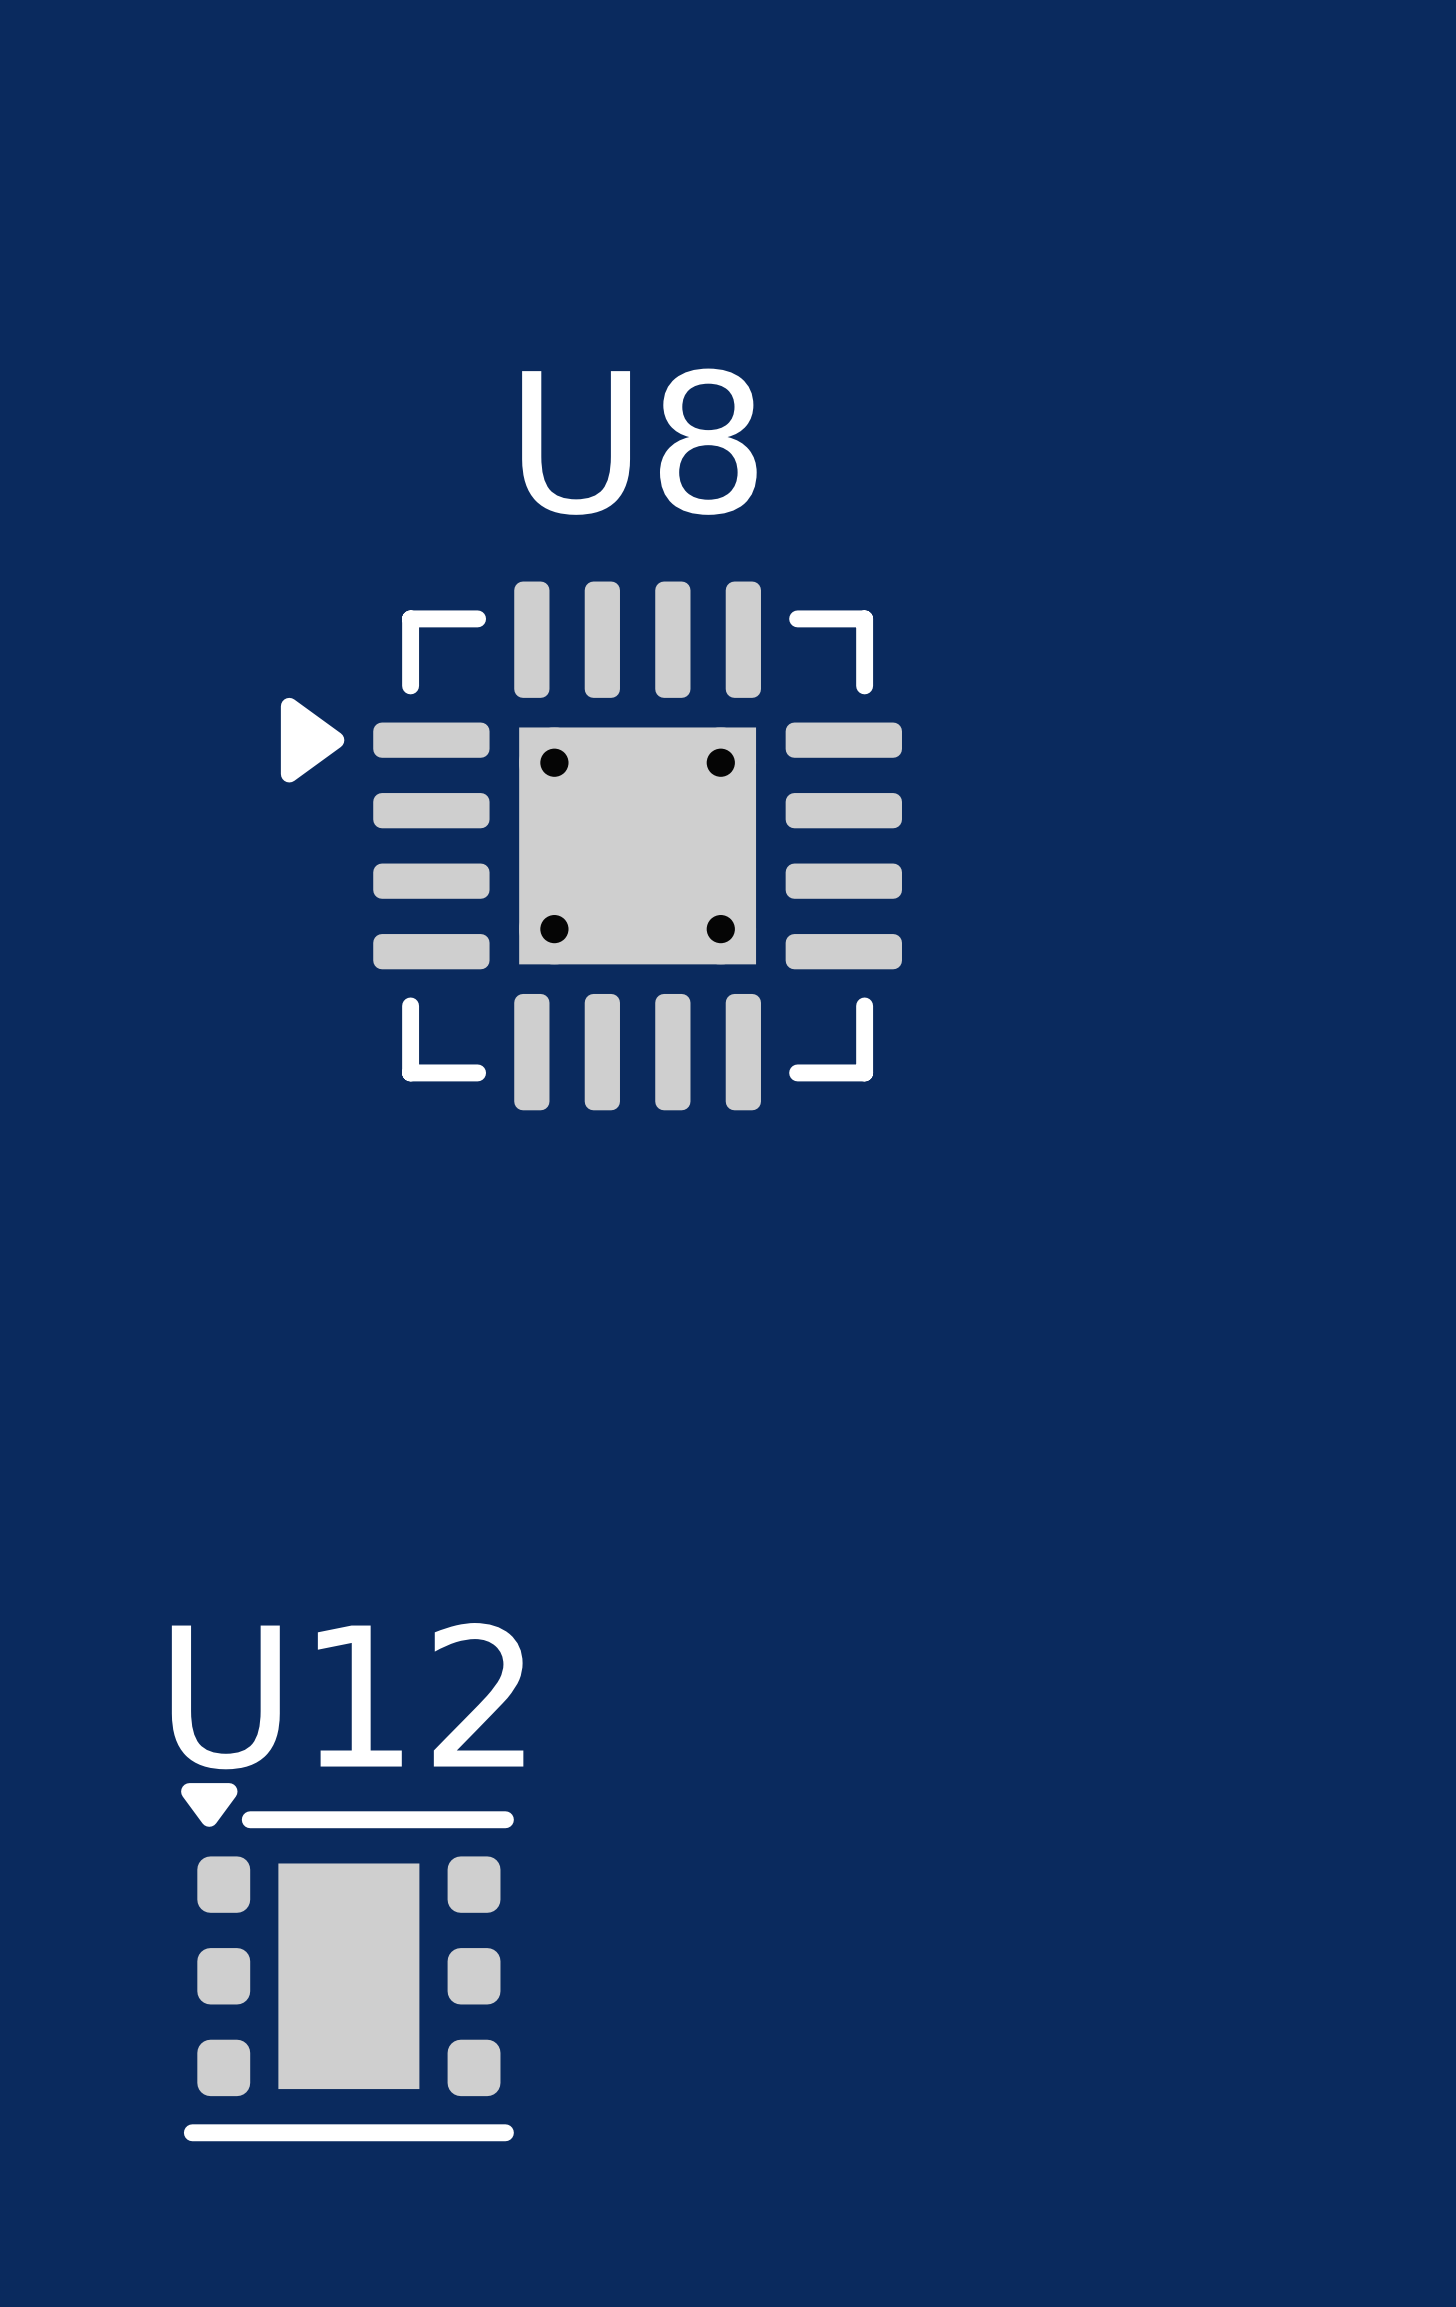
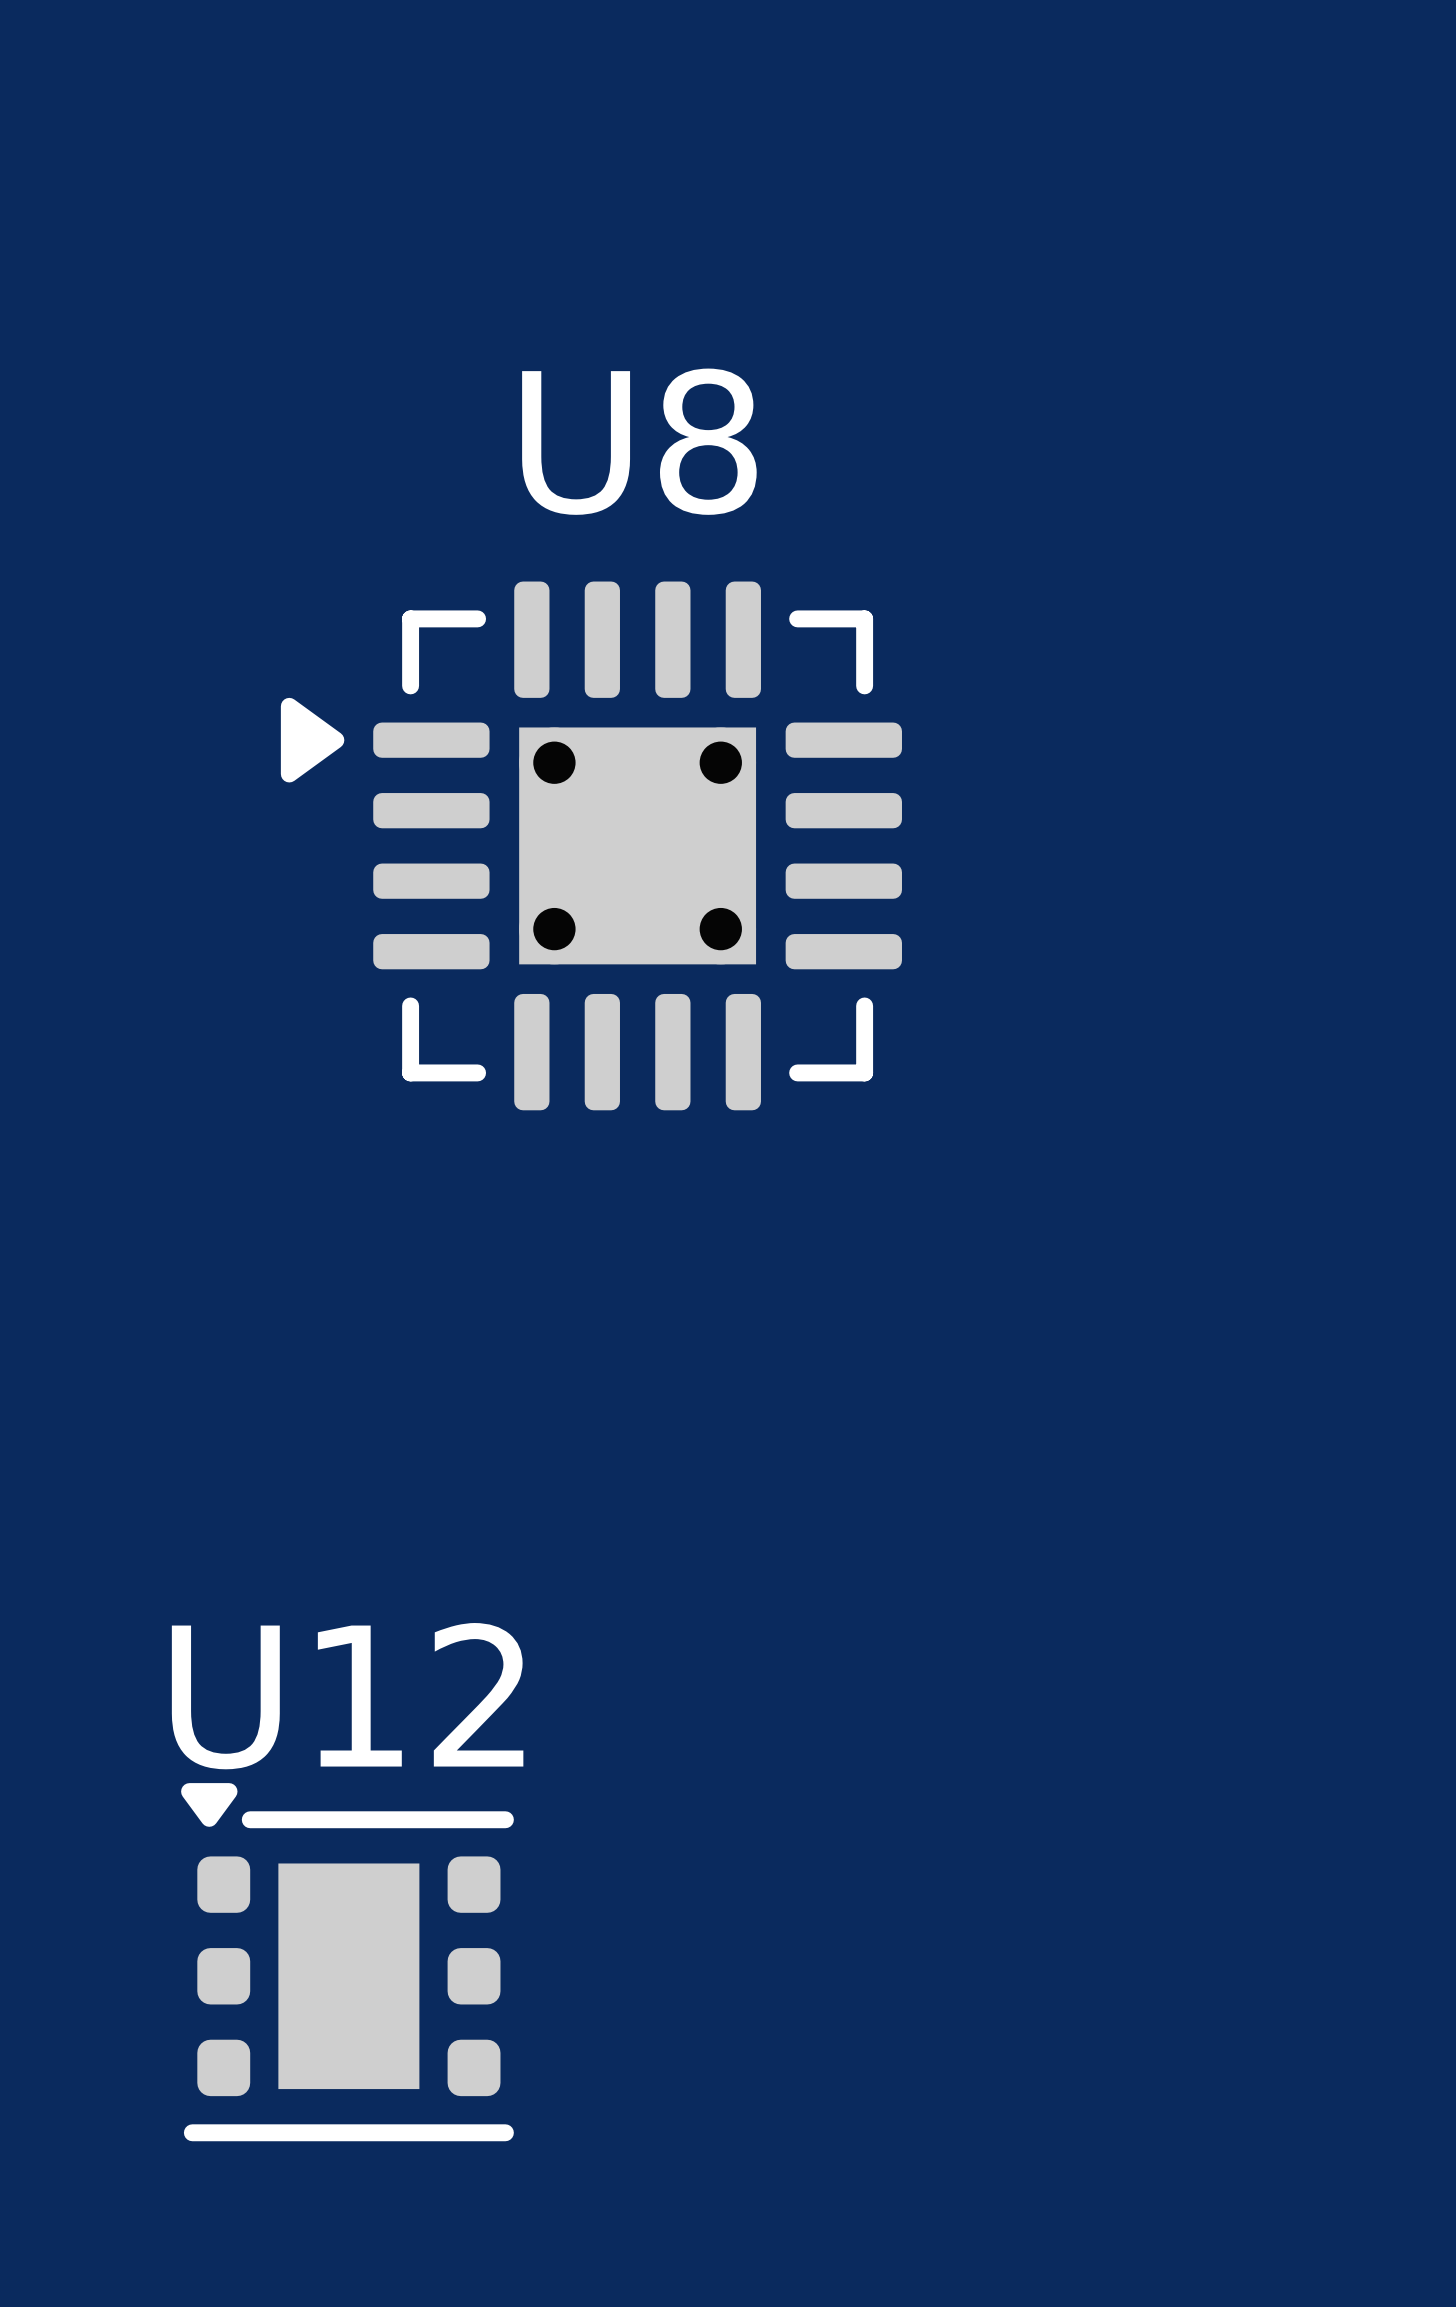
U8 footprint: [280, 581, 902, 1111] -> [280, 581, 902, 1111]

